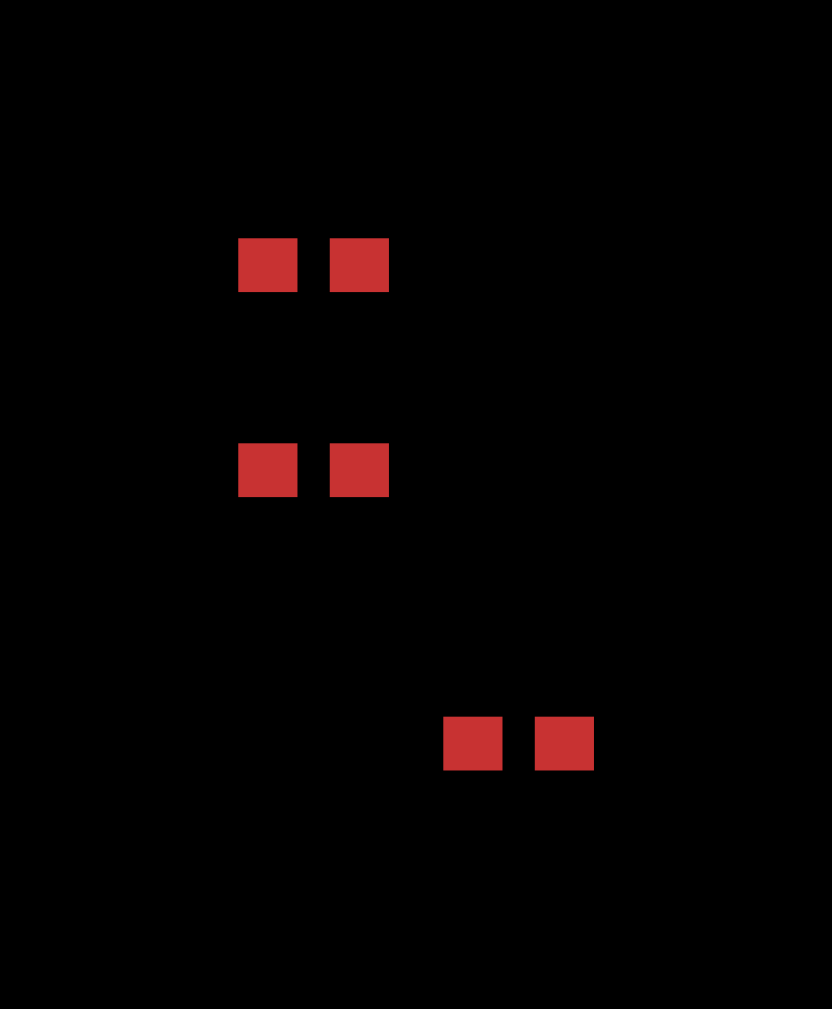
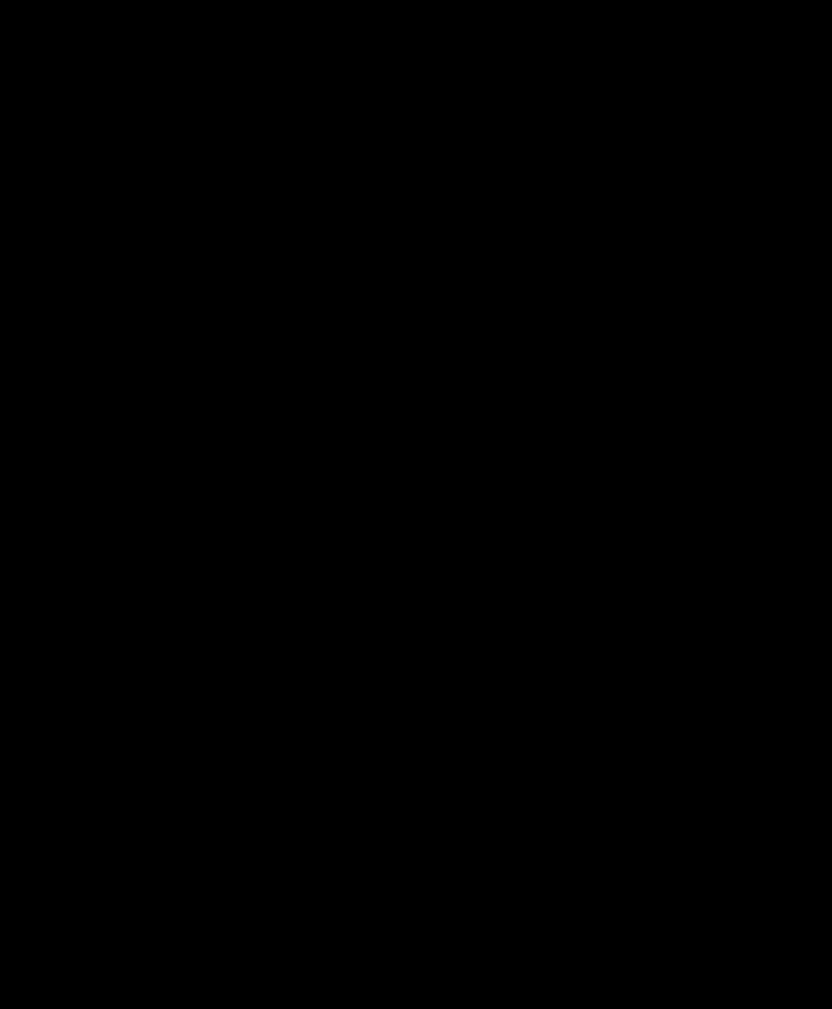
part: (313, 265) -> none
part: (313, 470) -> none
part: (518, 743) -> none

